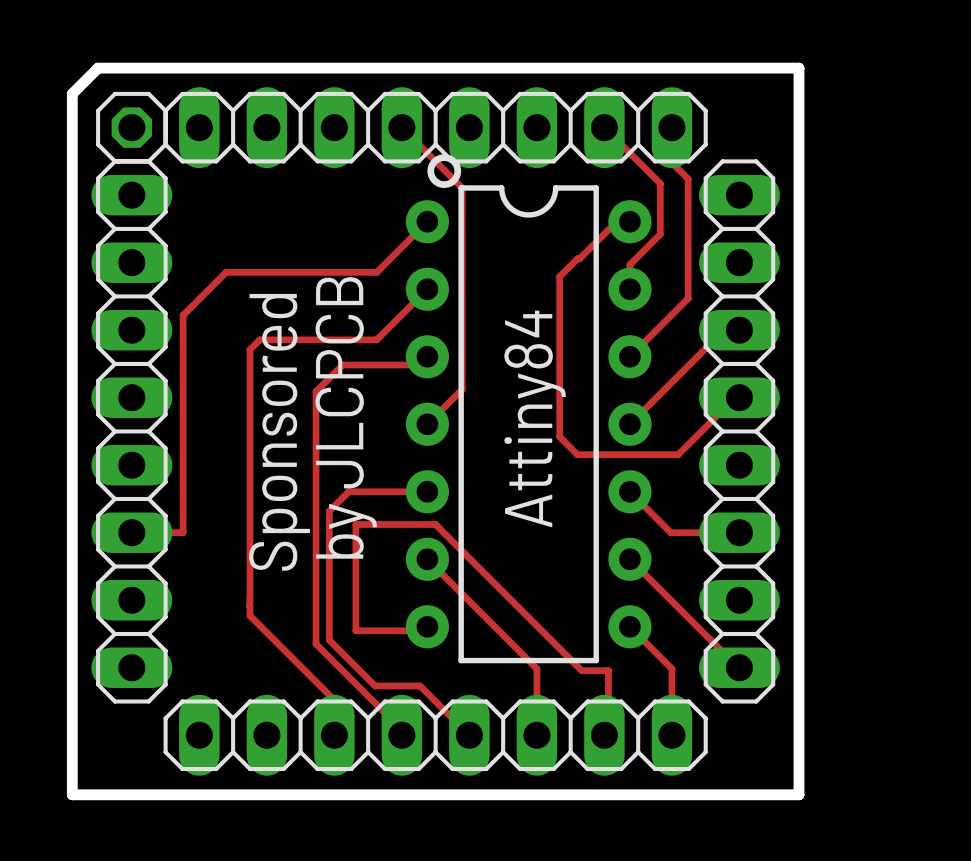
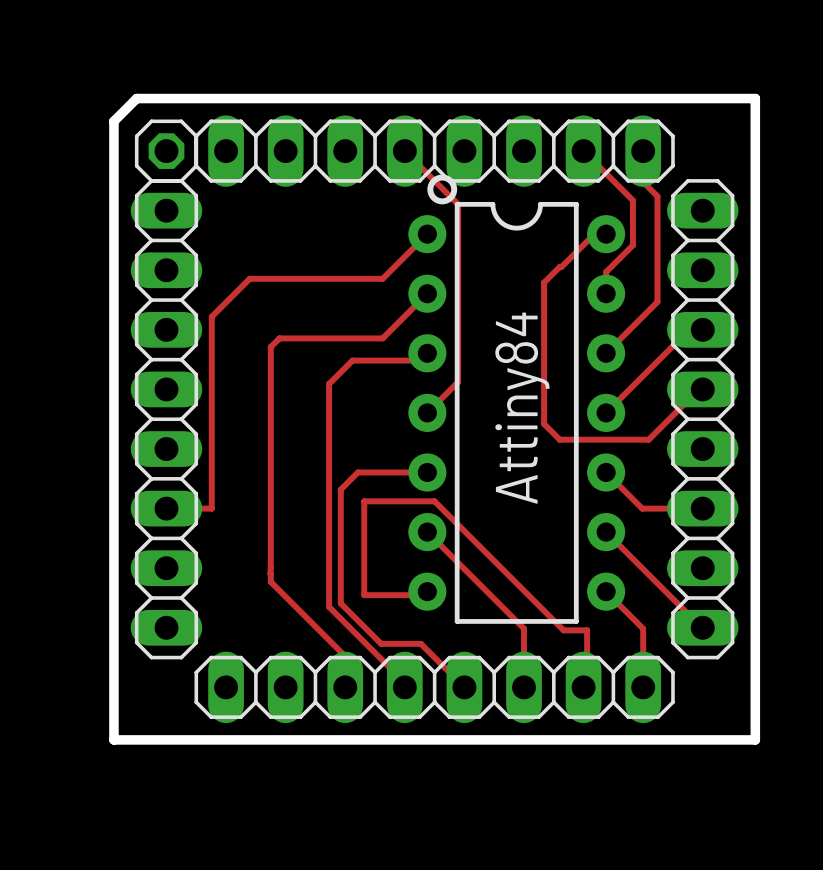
text: by JLCPCB (346, 417) -> none
text: Sponsored (279, 432) -> none

